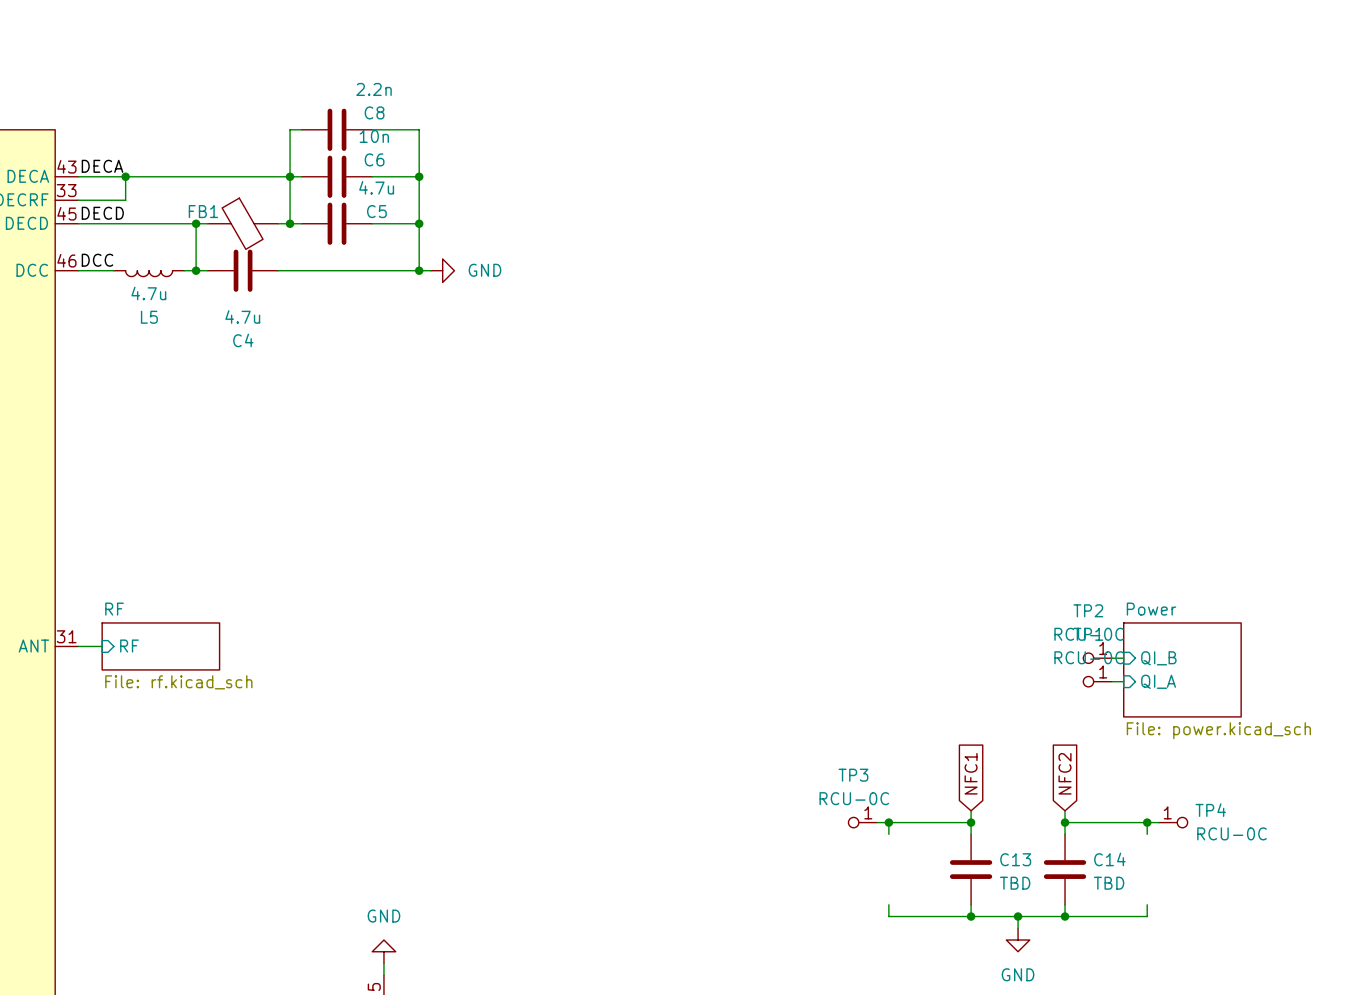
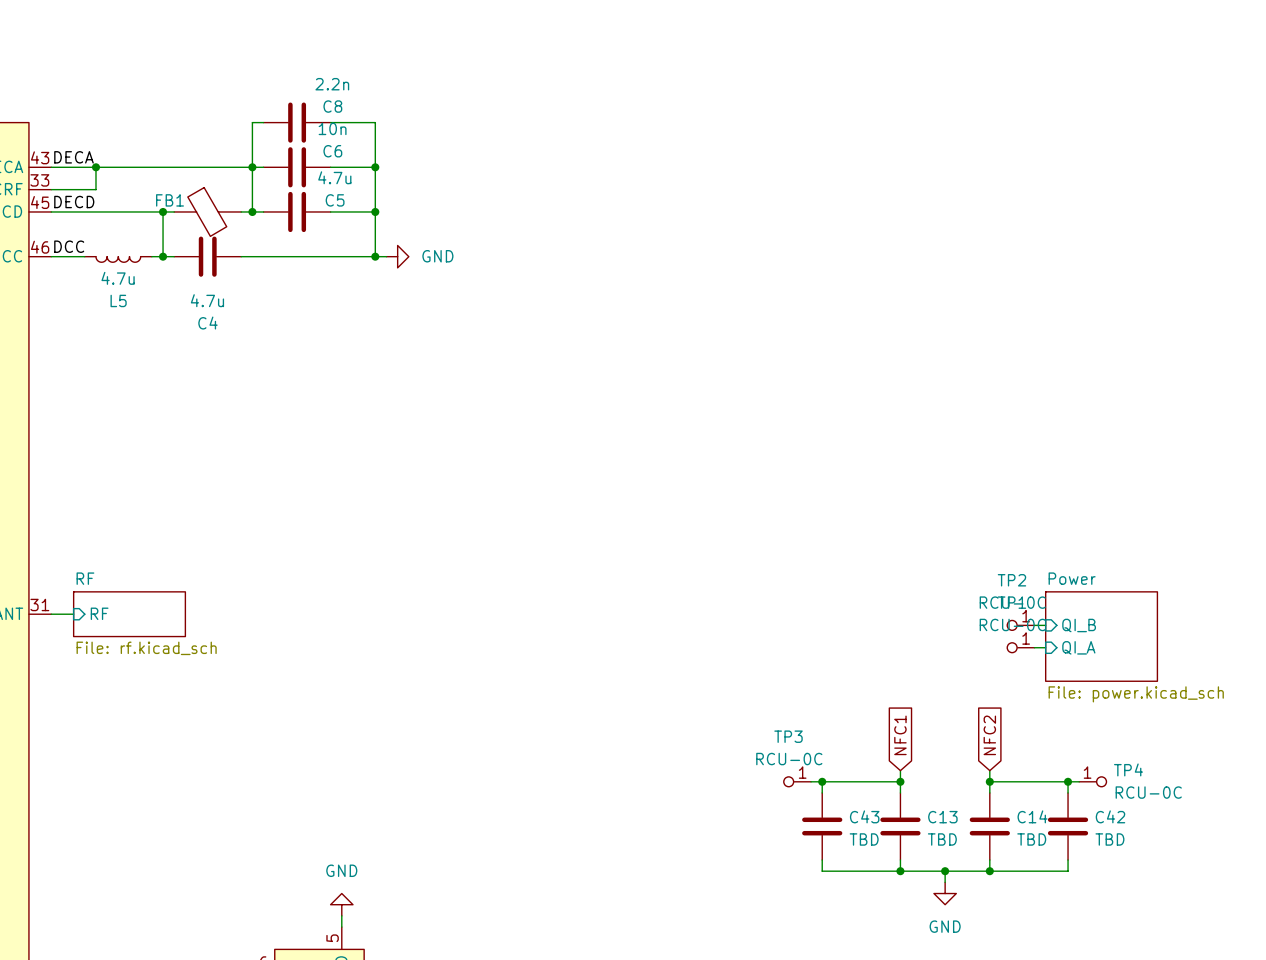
C43: none -> TBD (822, 826)
C42: none -> TBD (1068, 826)

